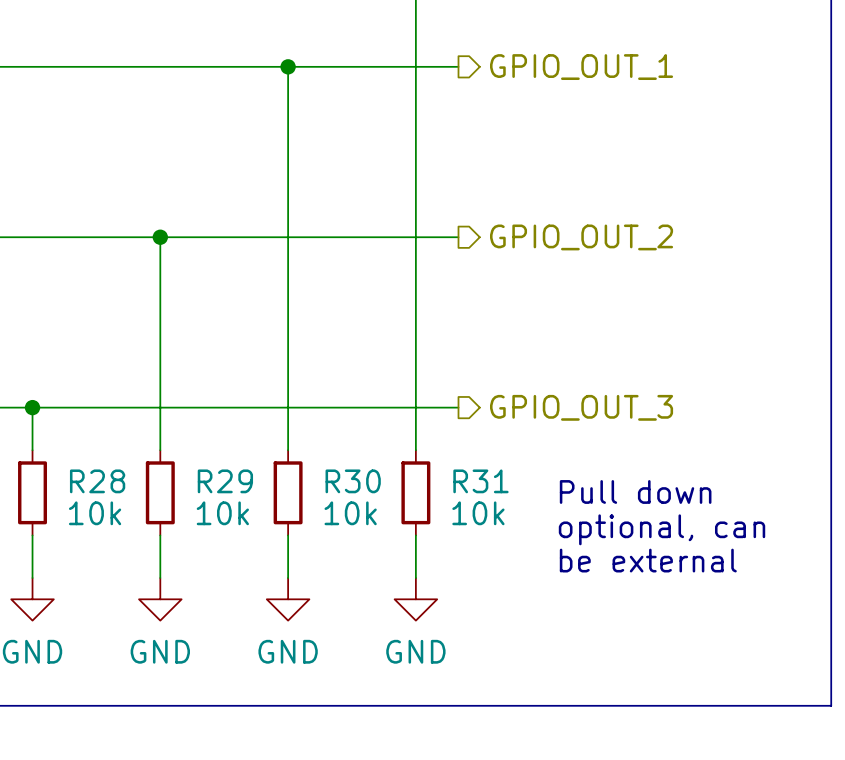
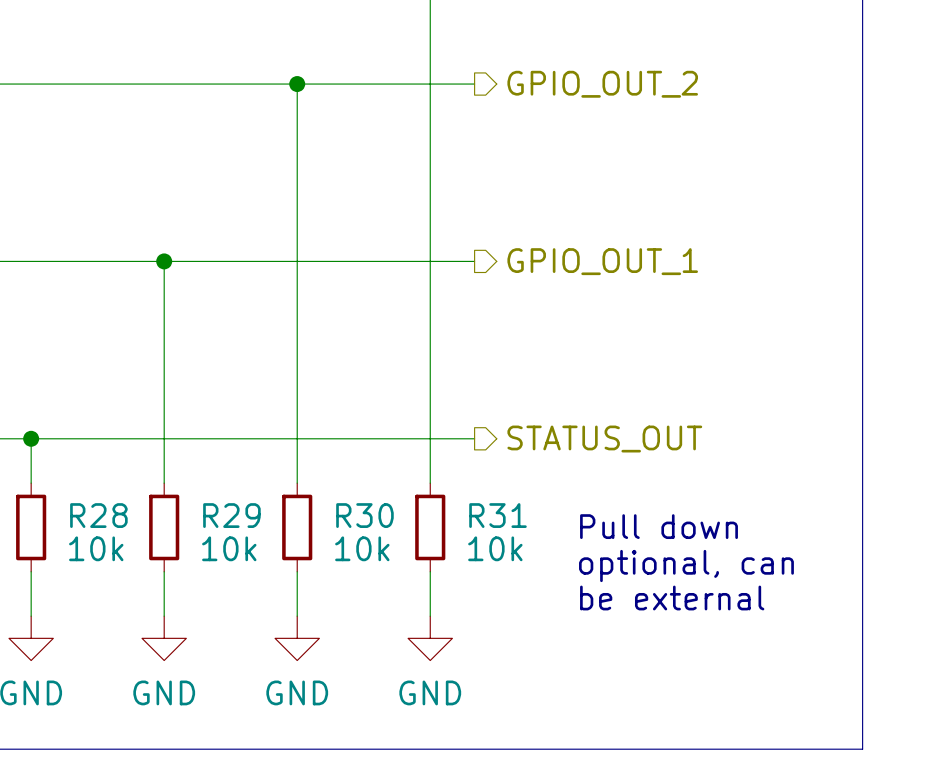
hierarchical label: GPIO_OUT_1 (581, 67) -> GPIO_OUT_2 (602, 84)
hierarchical label: GPIO_OUT_2 (581, 237) -> GPIO_OUT_1 (602, 261)
hierarchical label: GPIO_OUT_3 (581, 407) -> STATUS_OUT (604, 439)

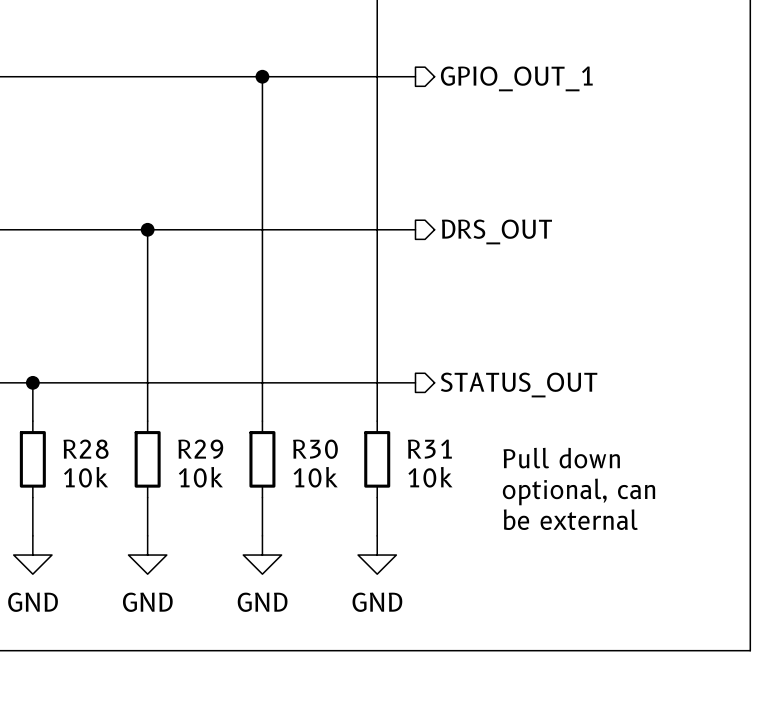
hierarchical label: GPIO_OUT_2 (602, 84) -> GPIO_OUT_1 (516, 78)
hierarchical label: GPIO_OUT_1 (602, 261) -> DRS_OUT (496, 231)

